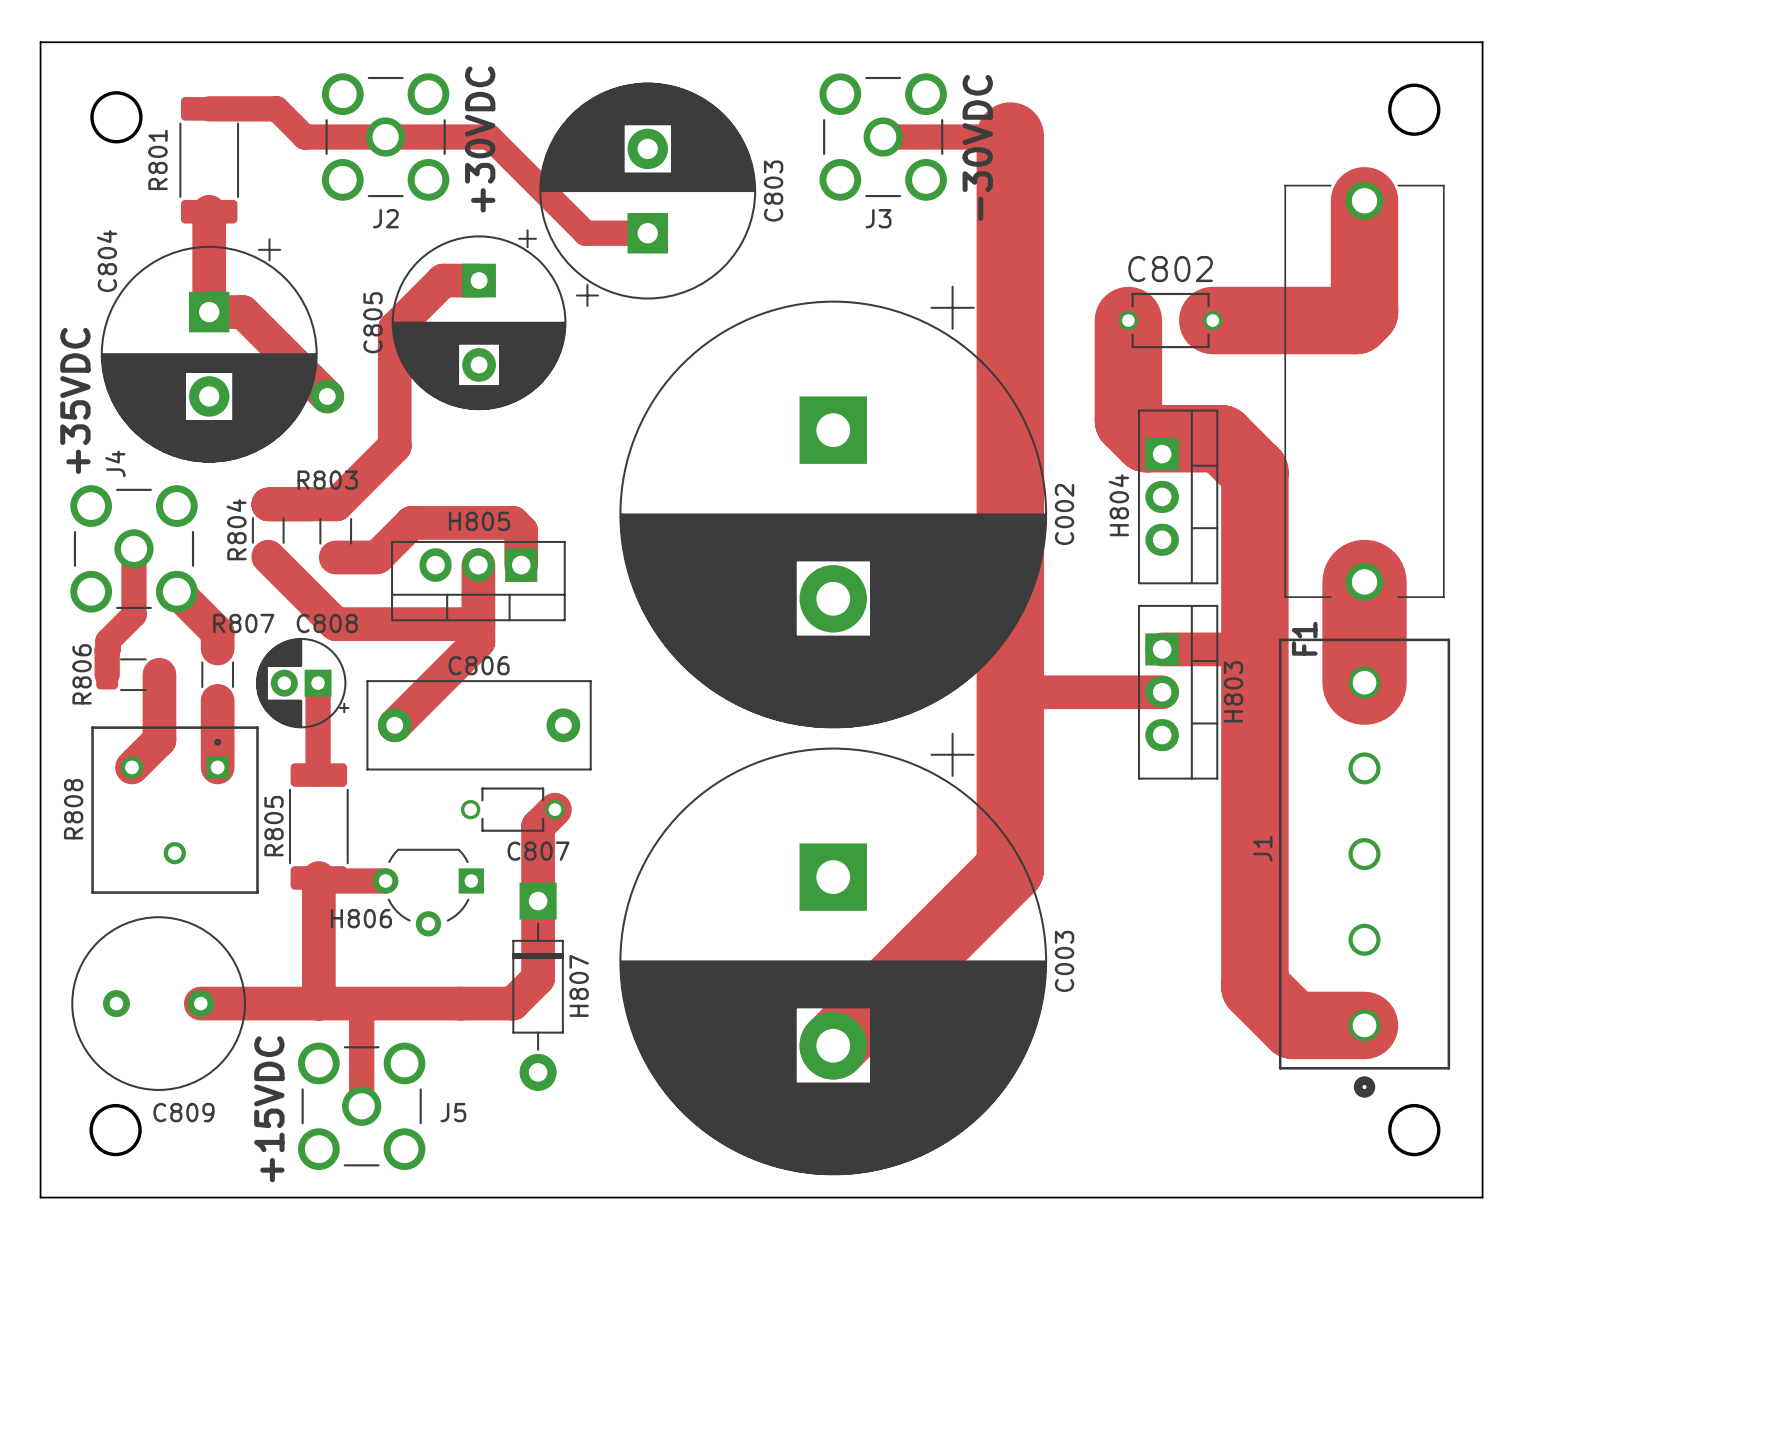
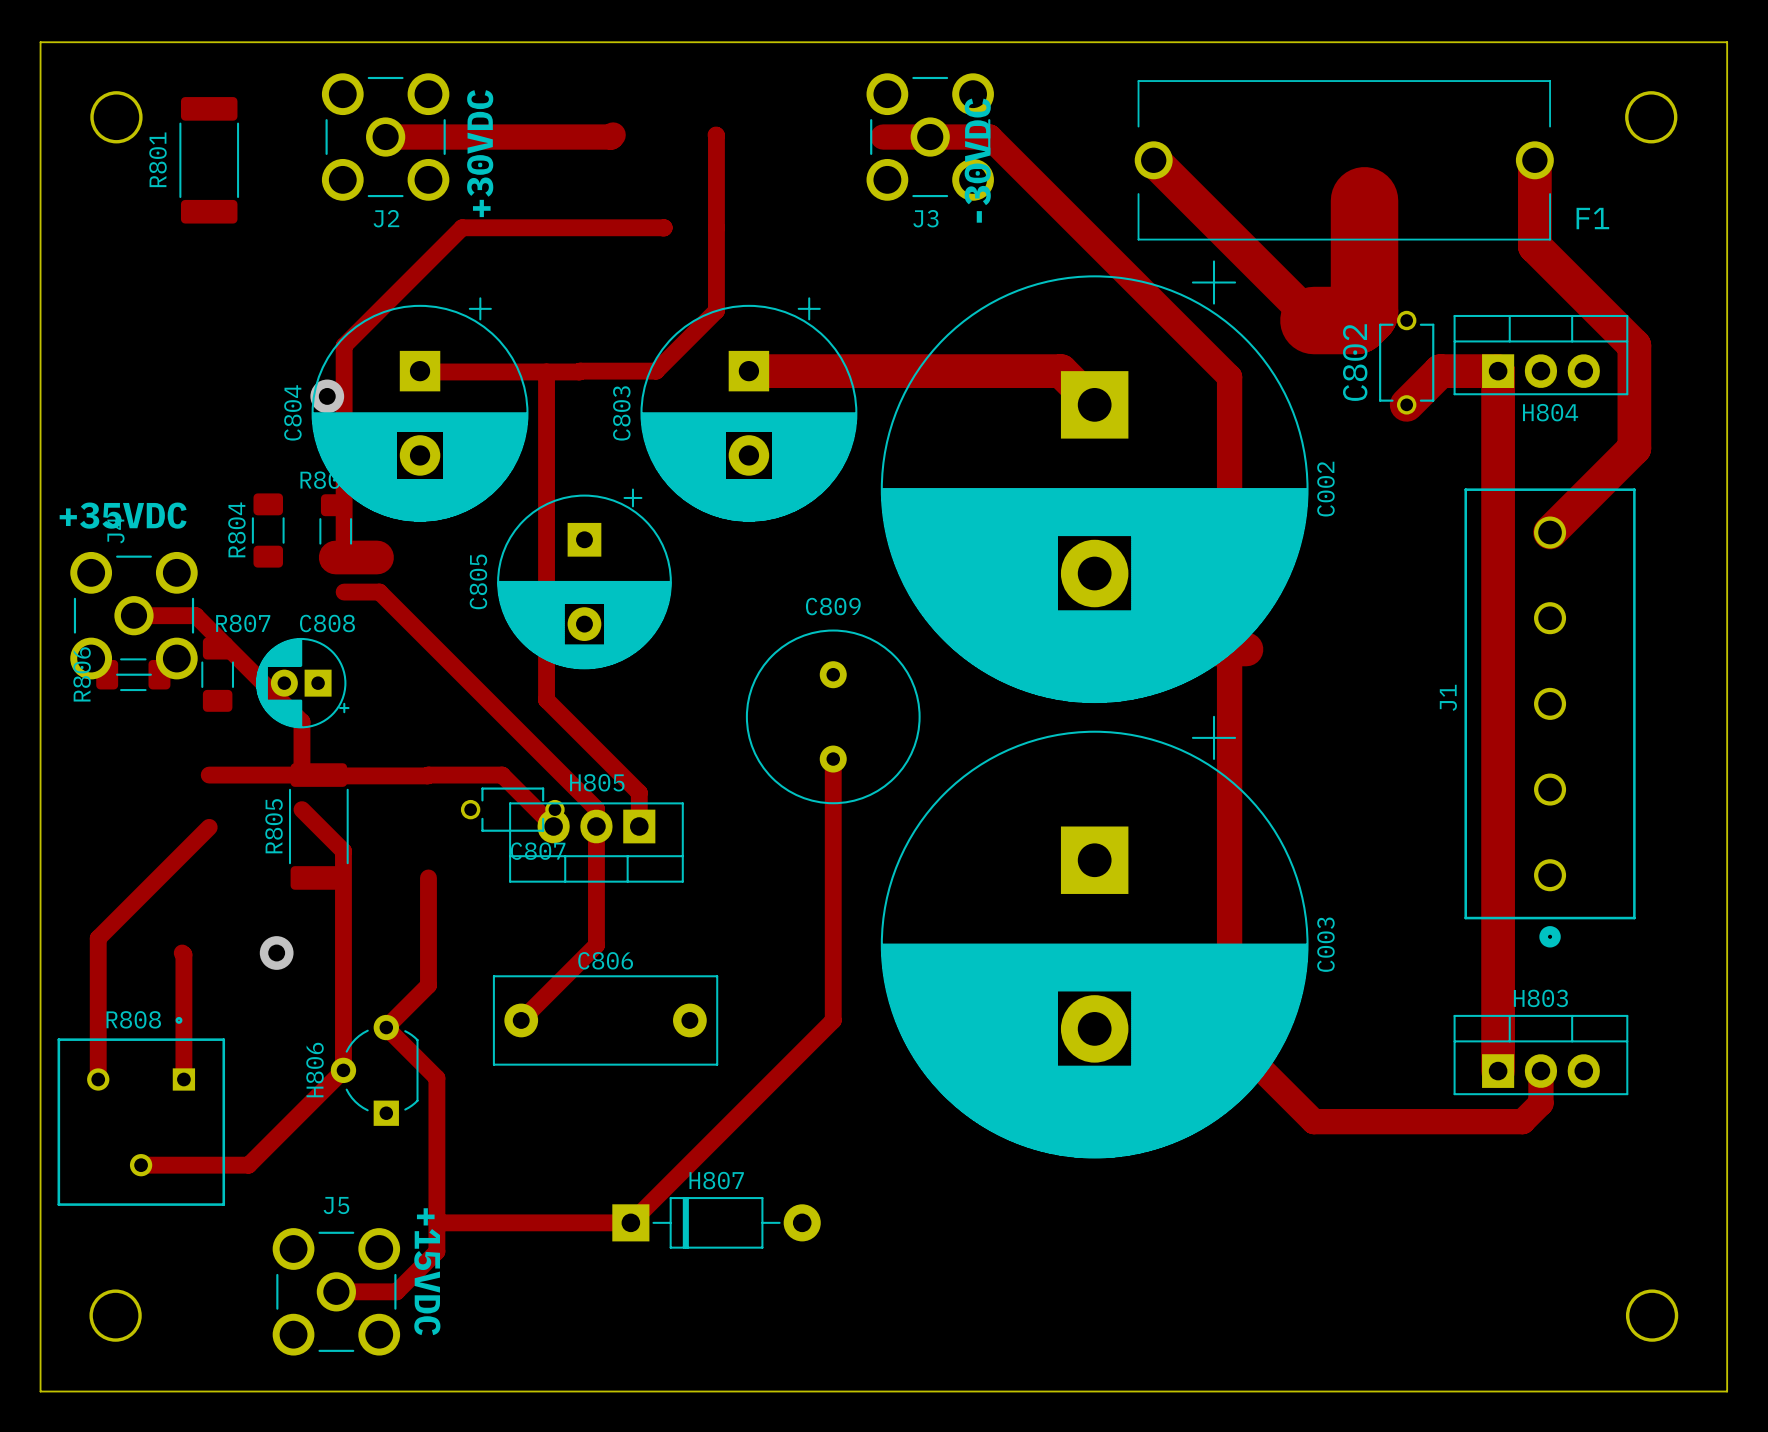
board edge: (1482, 42) (1482, 1197) (40, 1197) -> (1482, 42) (1727, 42) (1727, 1391) (40, 1391) (40, 1197)
track: (209, 108) (276, 108) (304, 137) (385, 137) -> none
round board edge position: (1414, 109) -> (1651, 117)
track: none -> (716, 135) (716, 310) (656, 371) (420, 371)
track: (1010, 136) (1010, 868) (833, 1045) -> none
track: (489, 137) (585, 233) (647, 233) -> (489, 137) (611, 137) (613, 135)
J3 position: (883, 137) -> (930, 137)
track: none -> (989, 137) (1229, 377) (1229, 1037) (1313, 1121) (1522, 1121) (1540, 1103) (1540, 1071)
track: none -> (1534, 160) (1534, 246) (1634, 345) (1634, 448) (1550, 532)
C803 rotation: 0° (647, 194) -> 180° (748, 409)
C803 position: (647, 194) -> (748, 409)
track: (209, 211) (209, 312) (242, 312) (327, 396) -> none
track: none -> (663, 228) (462, 227) (344, 345) (344, 539)
C804 name position: C804 (106, 261) -> C804 (292, 412)
C802 name position: C802 (1170, 269) -> C802 (1355, 362)
track: (479, 280) (443, 280) (394, 328) (394, 446) (336, 504) (268, 504) -> none
C805 position: (479, 319) -> (584, 578)
track: (1128, 320) (1128, 420) (1146, 438) (1221, 438) (1254, 472) (1254, 986) (1293, 1025) (1364, 1025) -> none
C802 rotation: 0° (1170, 320) -> 90° clockwise (1406, 362)
C802 position: (1170, 320) -> (1406, 362)
track: (1212, 320) (1313, 320) -> (1153, 160) (1313, 320)
C804 position: (209, 350) -> (420, 409)
track: none -> (546, 371) (546, 700) (639, 792) (639, 826)
track: none -> (748, 371) (1060, 371) (1094, 404)
F1 rotation: 0° (1364, 391) -> 90° clockwise (1344, 160)
text rotation: 0° (75, 400) -> 90° clockwise (123, 515)
track: none -> (1406, 404) (1440, 371) (1498, 371) (1498, 1071)
H804 rotation: 0° (1178, 496) -> 90° counterclockwise (1540, 355)
H804 position: (1178, 496) -> (1540, 355)
C002 position: (833, 507) -> (1094, 481)
track: (133, 548) (133, 615) (108, 640) (107, 674) -> none
J4 position: (133, 548) -> (133, 615)
track: (268, 556) (335, 624) (478, 624) -> none
track: (377, 556) (411, 522) (512, 522) (521, 531) (521, 565) -> none
track: (478, 565) (478, 641) (394, 725) -> none
H805 position: (478, 581) -> (596, 842)
track: (1364, 581) (1364, 682) -> none
track: (176, 591) (217, 632) (217, 648) -> none
track: none -> (344, 592) (379, 592) (596, 808) (596, 945) (521, 1020)
track: none -> (131, 615) (195, 615) (301, 721) (301, 775)
F1 name position: F1 (1304, 638) -> F1 (1592, 218)
track: (159, 674) (159, 739) (131, 767) -> none
track: (318, 683) (318, 775) -> none
track: (1010, 692) (1162, 692) -> none
H803 rotation: 0° (1178, 692) -> 90° counterclockwise (1540, 1055)
H803 position: (1178, 692) -> (1540, 1055)
track: (217, 700) (217, 767) -> none
C806 position: (479, 725) -> (605, 1020)
R808 footprint: [91, 726, 259, 894] -> [57, 1016, 226, 1206]
track: none -> (833, 759) (833, 1020) (630, 1222) (436, 1222)
track: none -> (209, 775) (301, 775)
track: none -> (301, 775) (502, 775) (553, 826)
R808 name position: R808 (73, 809) -> R808 (133, 1019)
track: none -> (301, 809) (343, 851) (343, 1070) (248, 1165) (141, 1165)
track: (554, 809) (538, 826) (538, 978) (512, 1003) (200, 1003) -> none
track: none -> (209, 827) (98, 938) (98, 1079)
J1 position: (1364, 868) -> (1550, 717)
track: none -> (428, 877) (428, 985) (386, 1027) (436, 1078) (436, 1251) (396, 1291) (336, 1291)
track: (385, 880) (321, 880) (318, 877) (318, 1003) -> none
H806 rotation: 0° (428, 892) -> 90° clockwise (374, 1070)
H806 position: (428, 892) -> (374, 1070)
track: none -> (182, 953) (183, 954) (183, 1079)
via: none -> (276, 953)
C003 position: (833, 953) -> (1094, 937)
H807 rotation: 0° (538, 986) -> 90° counterclockwise (716, 1222)
H807 position: (538, 986) -> (716, 1222)
C809 rotation: 0° (158, 1003) -> 90° clockwise (833, 716)
C809 position: (158, 1003) -> (833, 716)
track: (361, 1003) (361, 1106) -> none
J5 position: (361, 1106) -> (336, 1291)
text rotation: 0° (269, 1109) -> 180° (427, 1271)
text position: +15VDC (269, 1109) -> +15VDC (427, 1271)
C809 name position: C809 (183, 1112) -> C809 (833, 606)
J5 name position: J5 (453, 1112) -> J5 (336, 1205)
round board edge position: (115, 1130) -> (115, 1315)
round board edge position: (1414, 1130) -> (1652, 1315)

